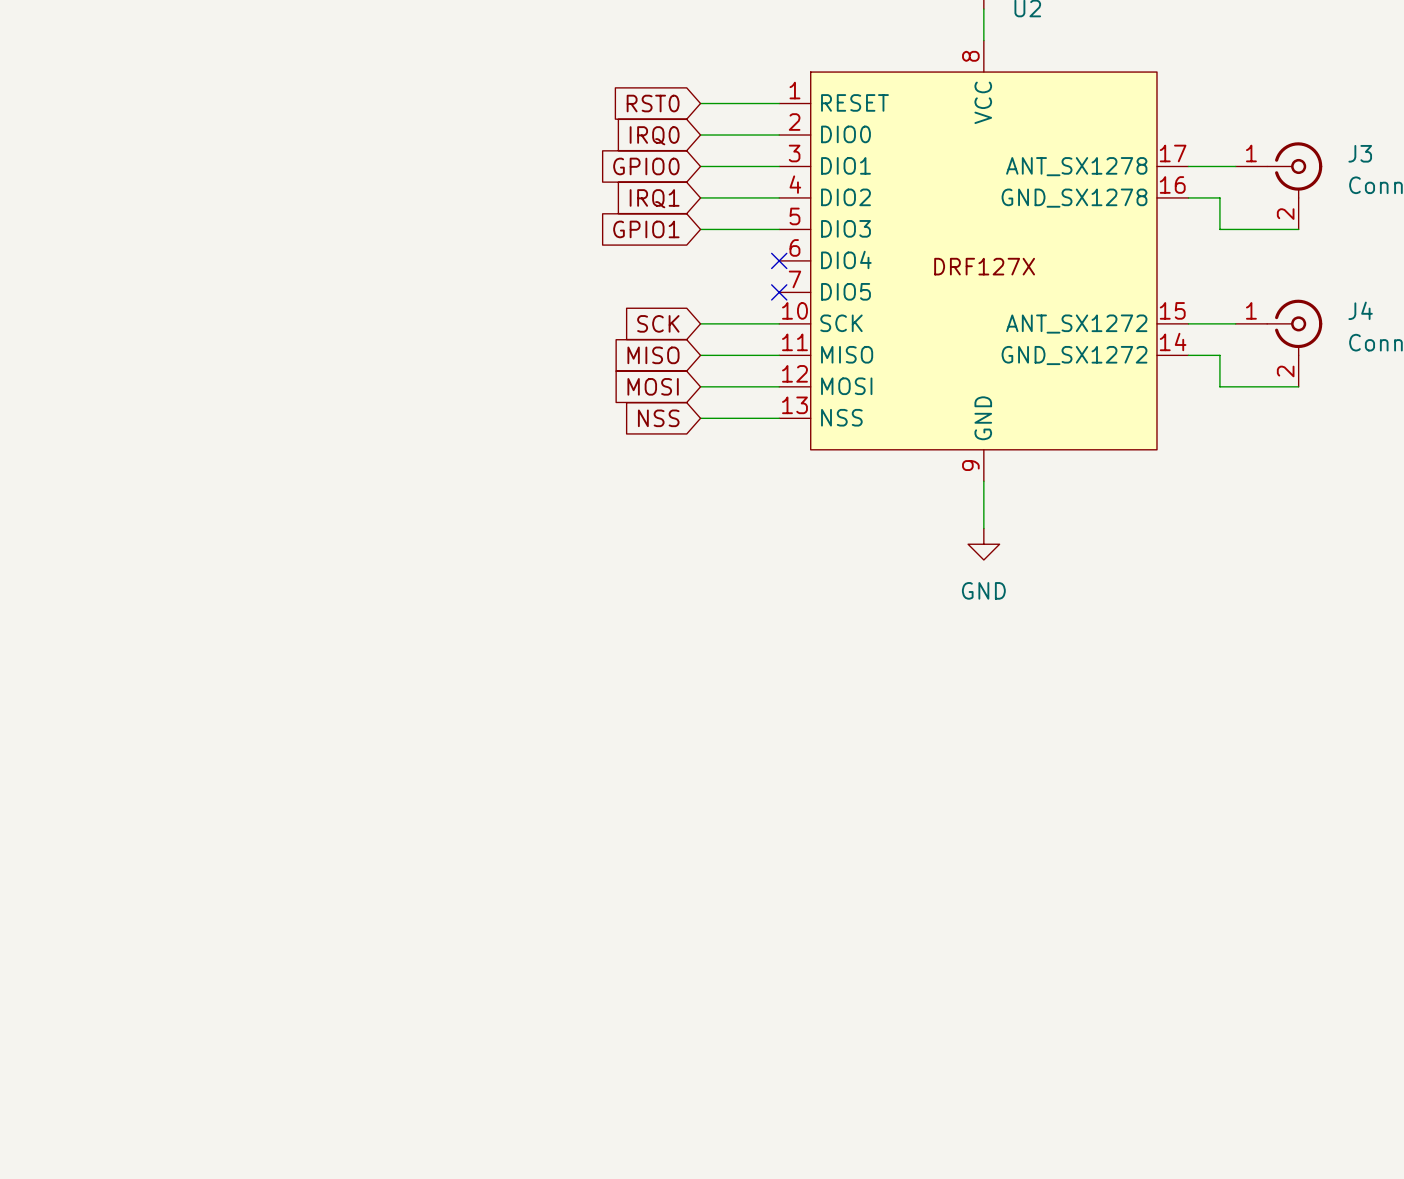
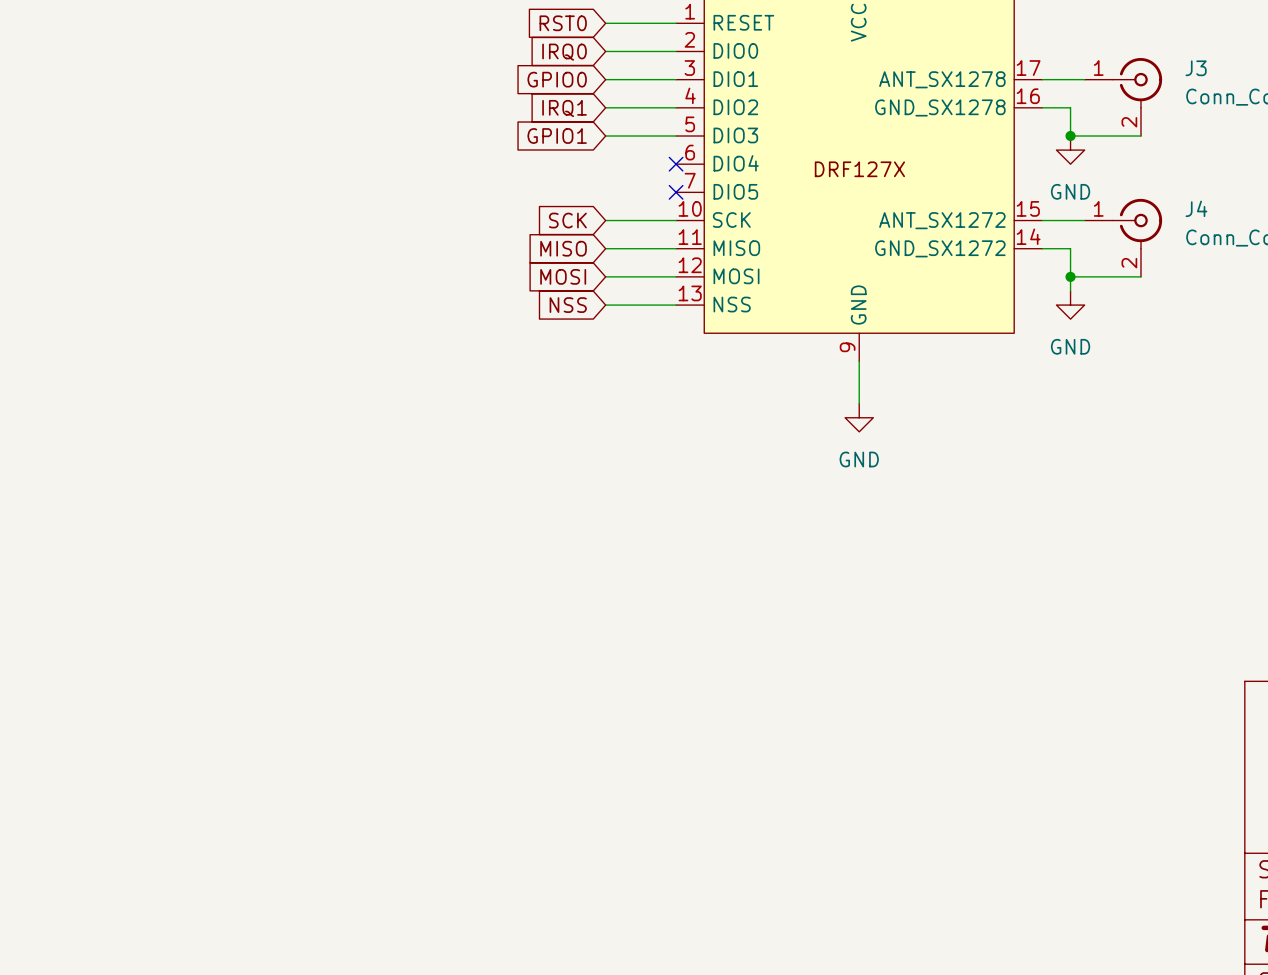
junction: none -> (1070, 136)
power symbol: none -> GND (1070, 150)
wire: none -> (1070, 276) (1070, 290)
junction: none -> (1070, 276)
power symbol: none -> GND (1070, 305)

